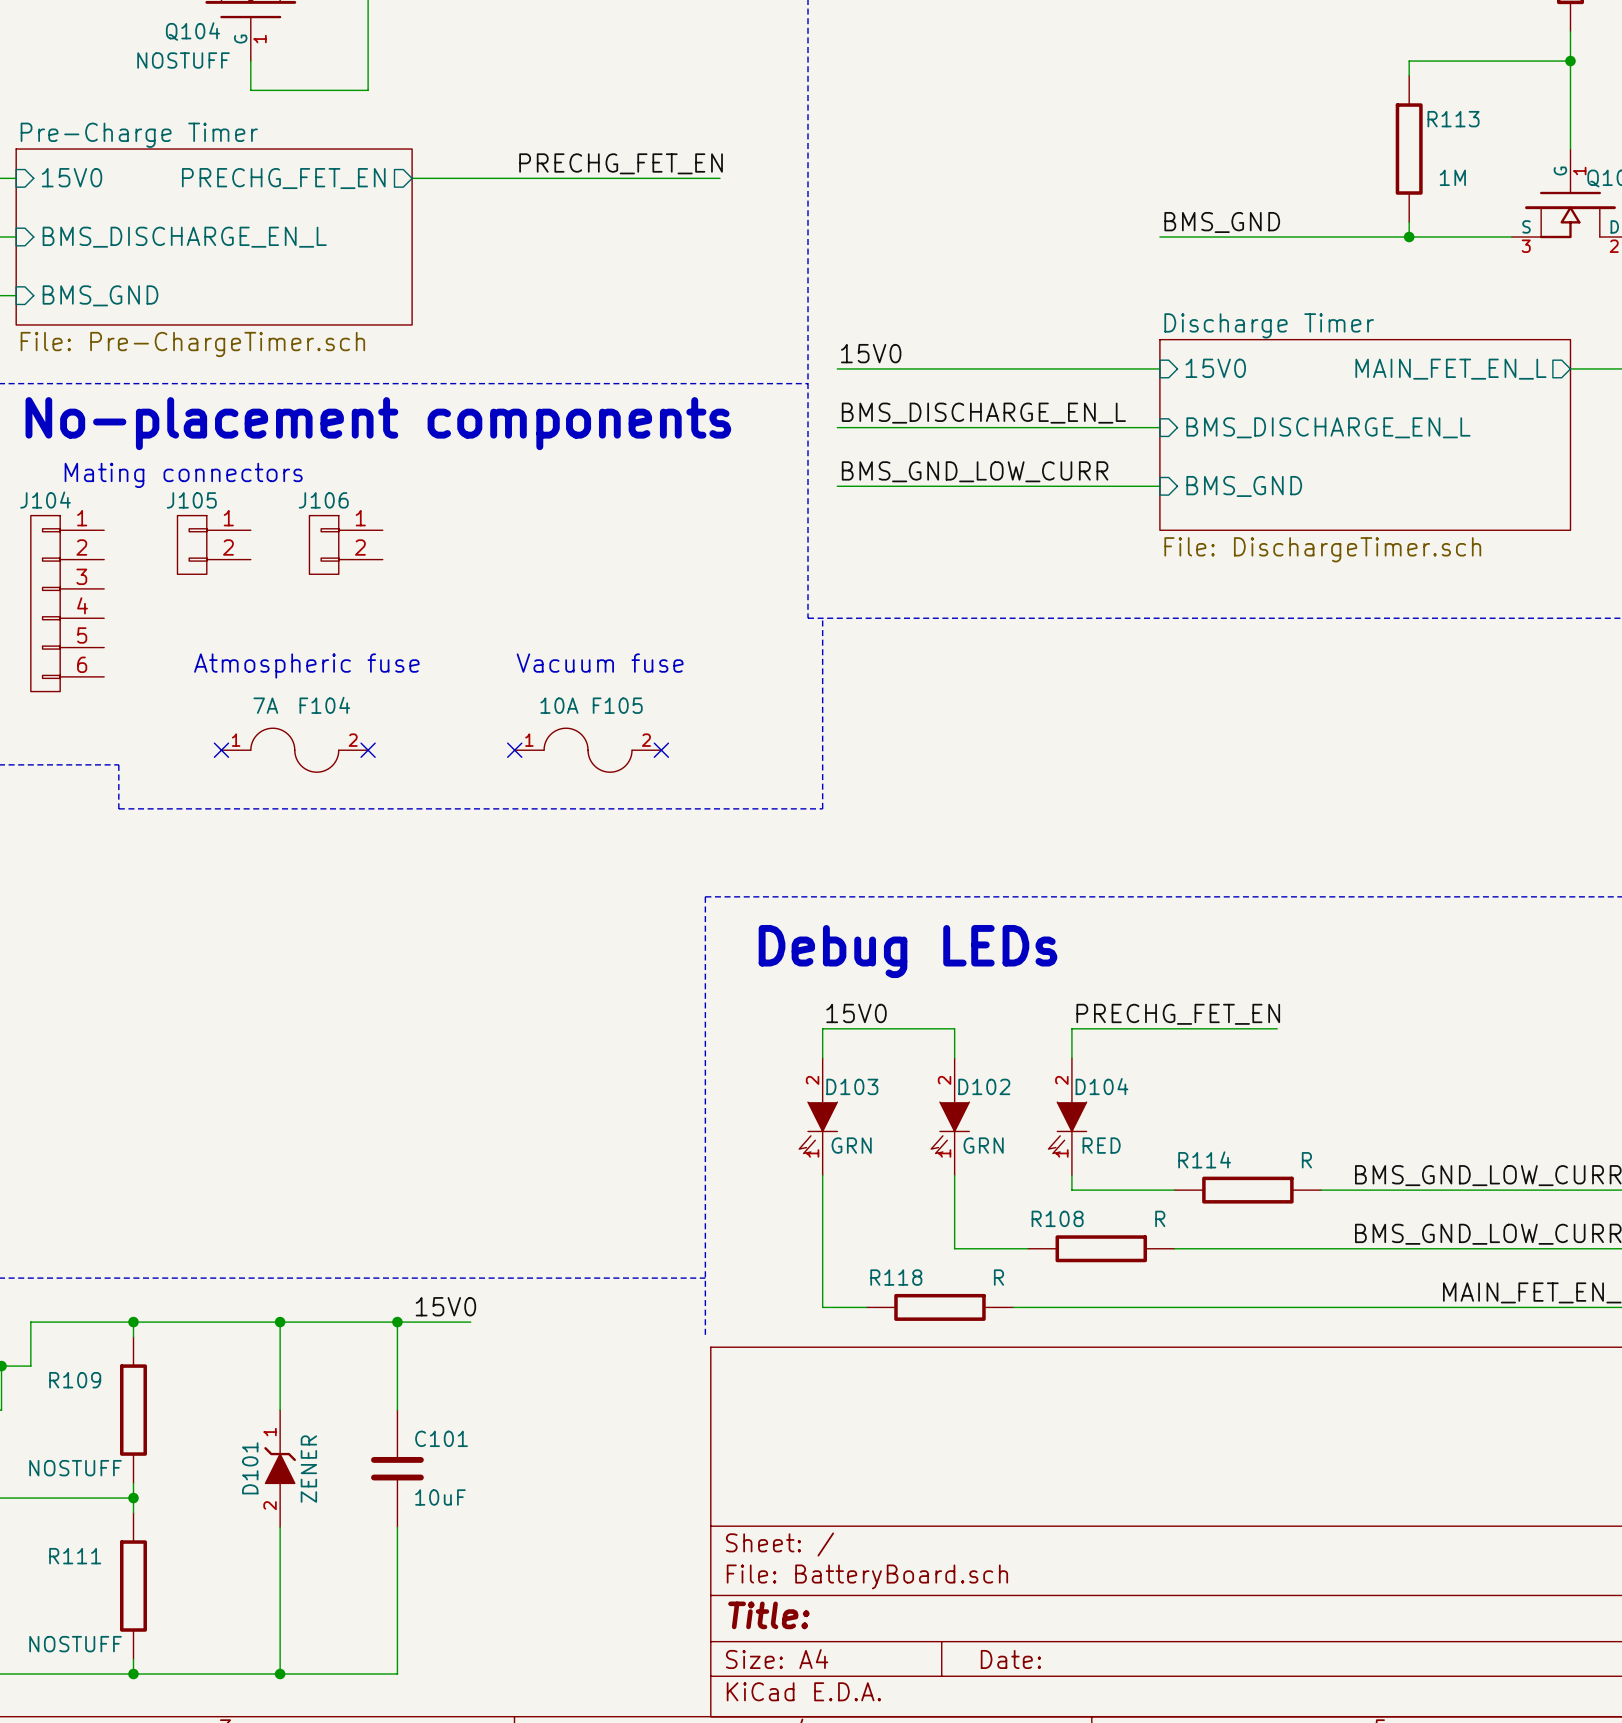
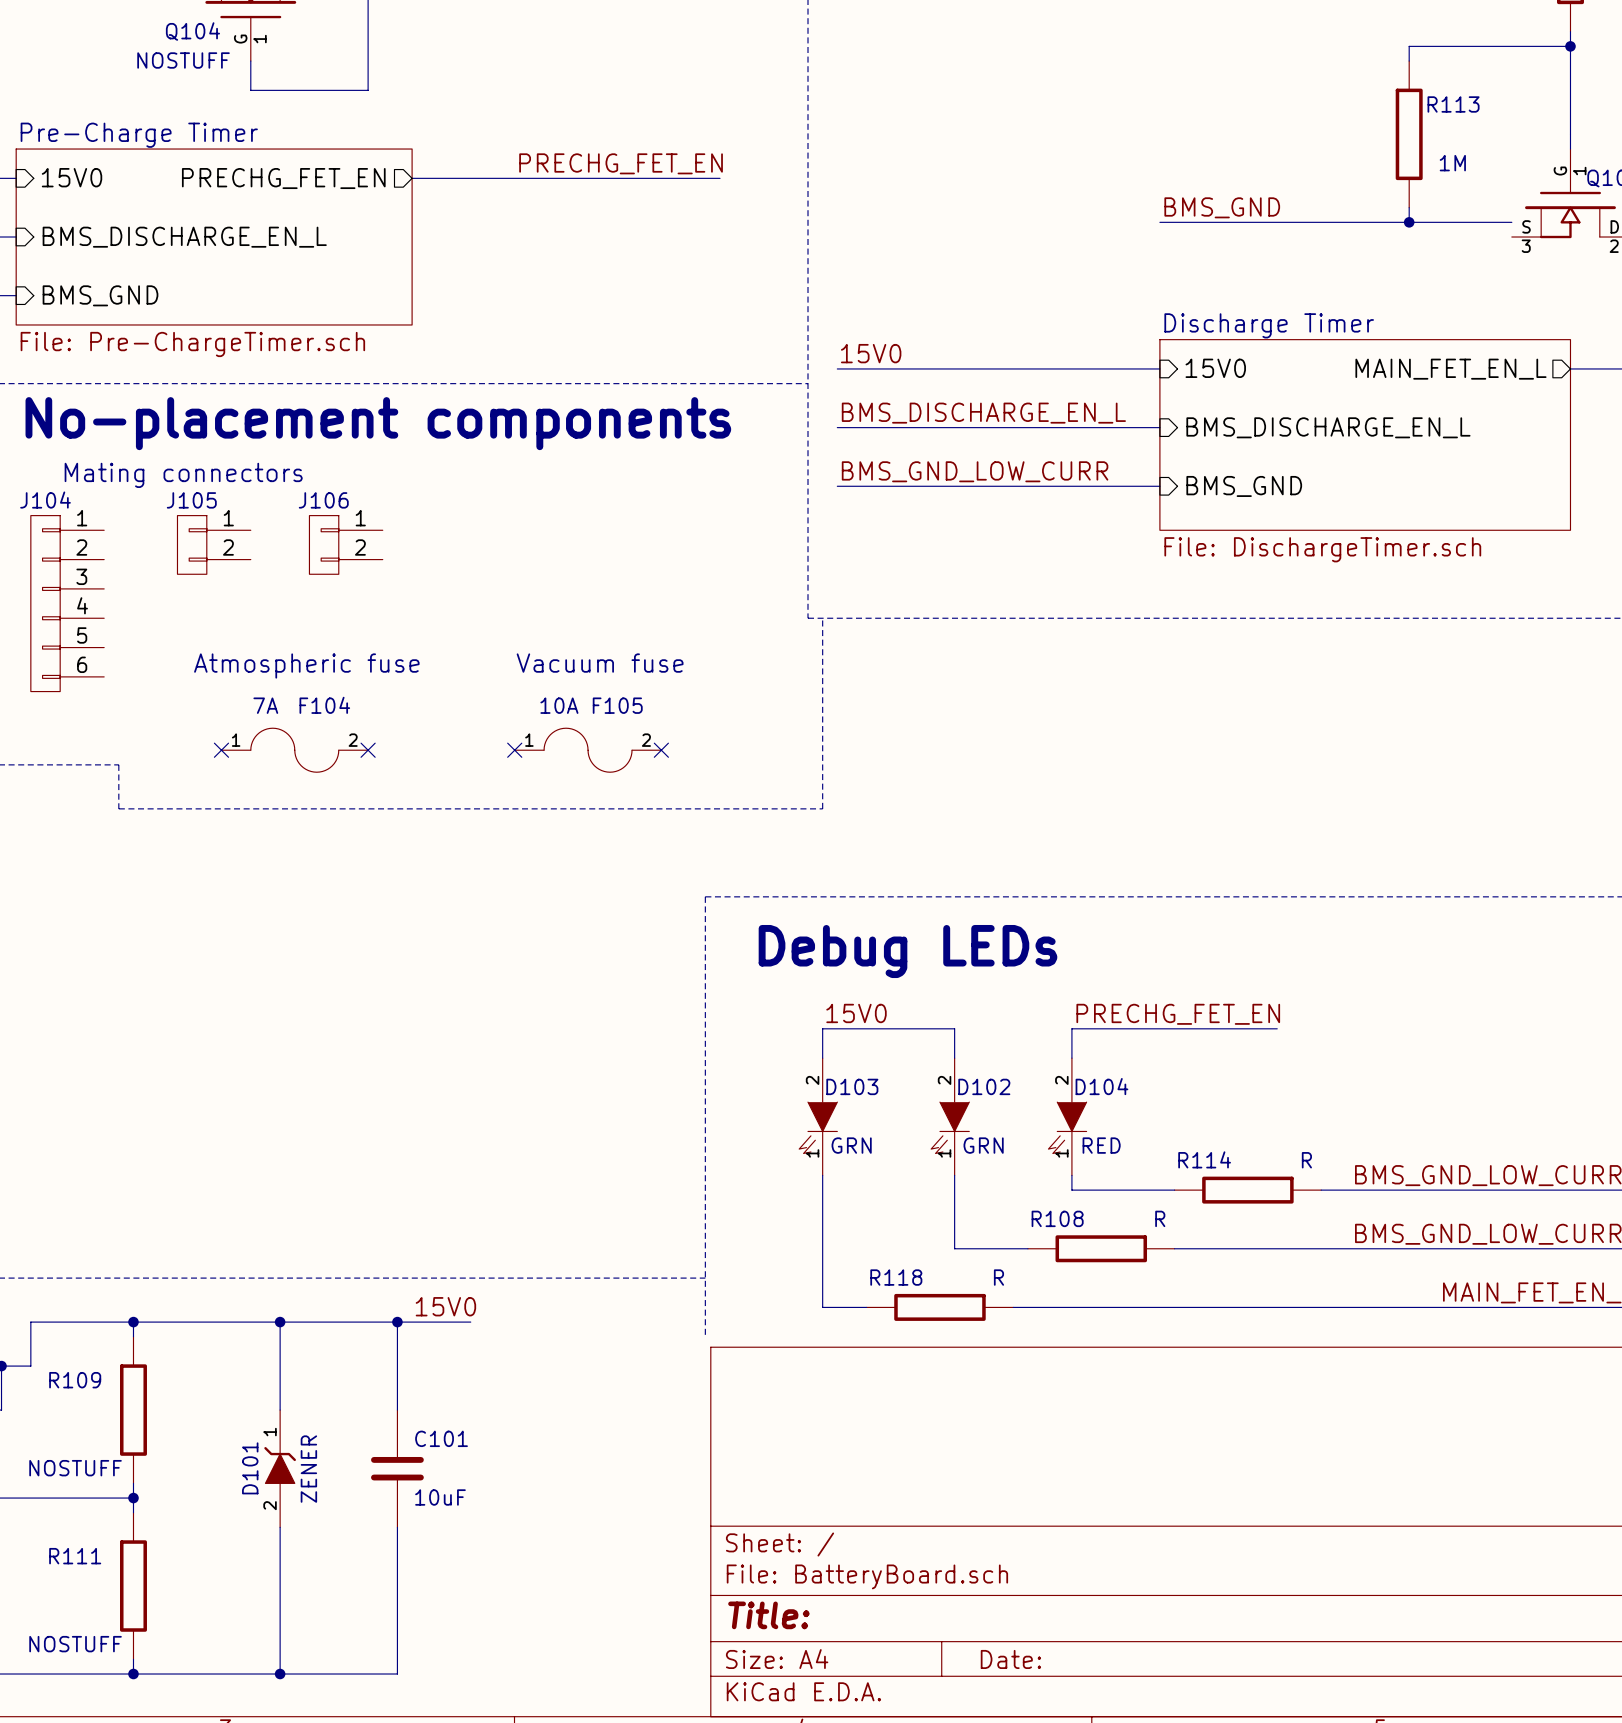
wire: (1570, 61) (1409, 61) (1409, 75) -> (1570, 46) (1409, 46) (1409, 61)
junction position: (1570, 61) -> (1570, 46)
R113 position: (1409, 149) -> (1409, 134)
label position: BMS_GND (1222, 222) -> BMS_GND (1222, 207)
wire: (1159, 237) (1511, 237) -> (1159, 222) (1511, 222)
junction position: (1409, 237) -> (1409, 222)

